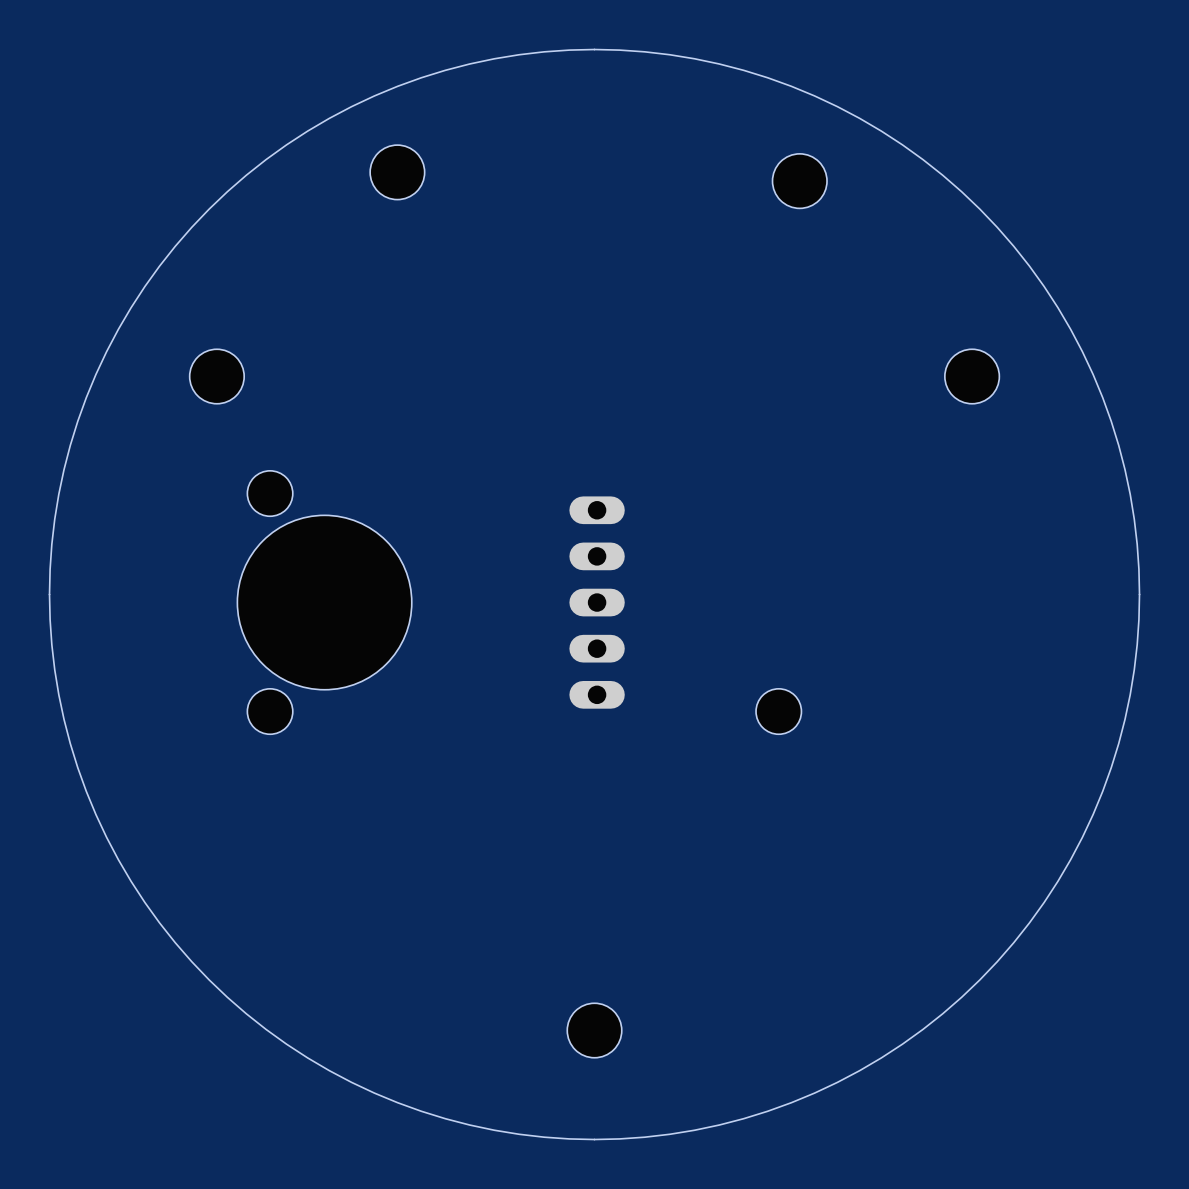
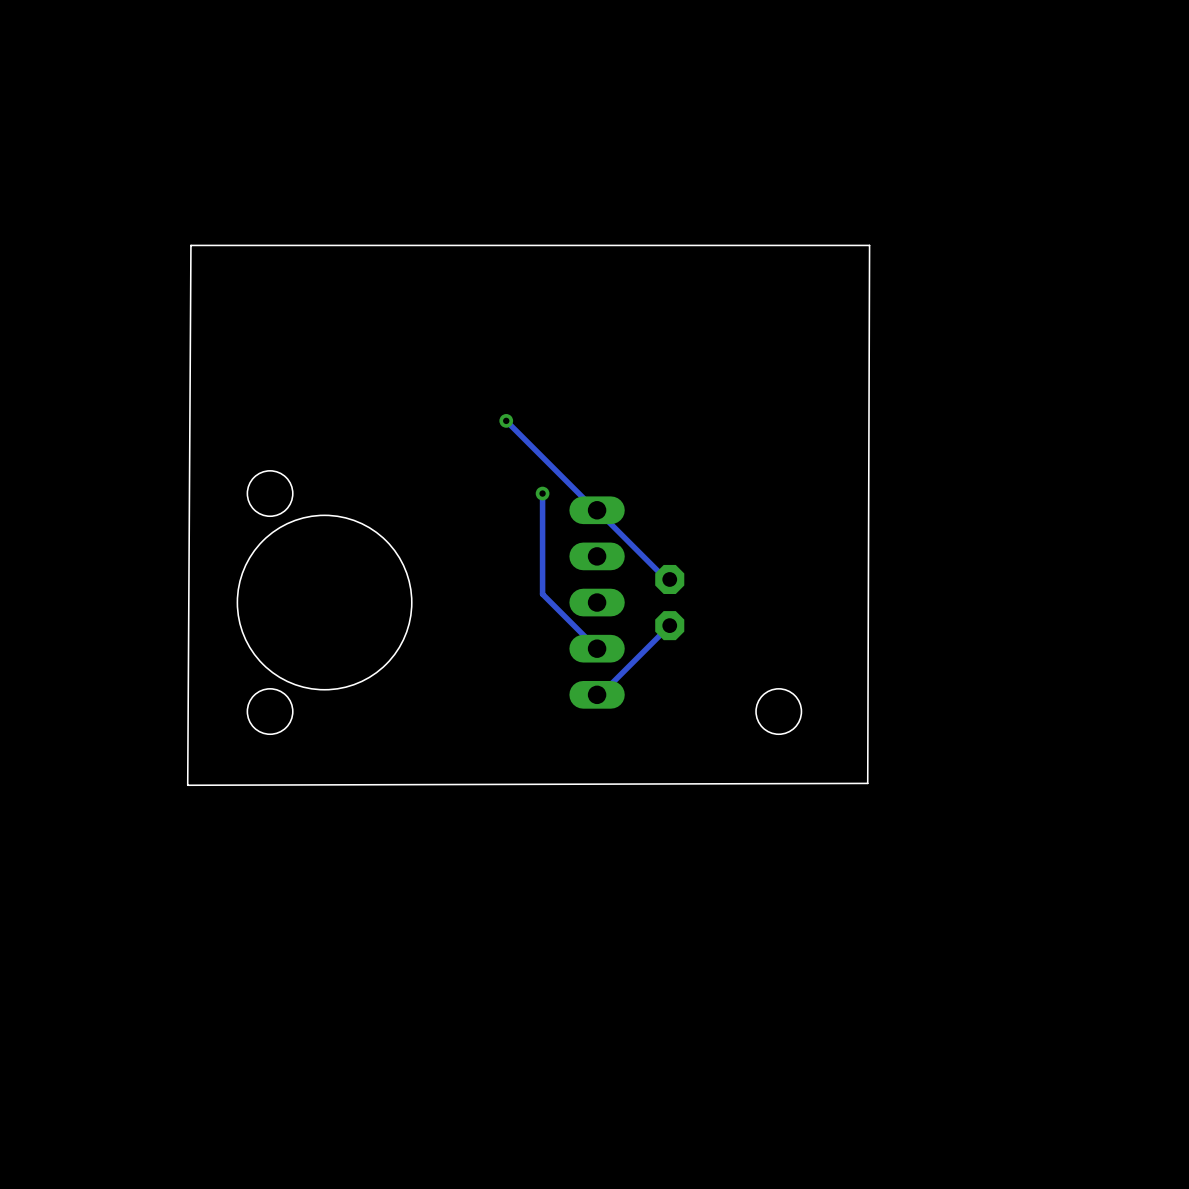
board edge: (594, 49) (544, 51) (494, 58) (445, 70) (397, 86) (351, 106) (307, 131) (246, 175) (209, 209) (175, 246) (131, 307) (106, 351) (86, 397) (70, 445) (58, 494) (51, 544) (49, 594) (51, 644) (58, 694) (70, 743) (86, 791) (106, 837) (131, 881) (175, 942) (209, 979) (246, 1013) (307, 1057) (351, 1082) (397, 1102) (445, 1118) (494, 1130) (544, 1137) (594, 1139) (644, 1137) (694, 1130) (743, 1118) (791, 1102) (837, 1082) (881, 1057) (942, 1013) (979, 979) (1013, 942) (1057, 881) (1082, 837) (1102, 791) (1118, 743) (1130, 694) (1137, 644) (1139, 594) (1137, 544) (1130, 494) (1118, 445) (1102, 397) (1082, 351) (1057, 307) (1013, 246) (979, 209) (942, 175) (881, 131) (837, 106) (791, 86) (743, 70) (694, 58) (644, 51) (594, 49) -> none
hole: (397, 172) -> none
hole: (799, 181) -> none
board edge: none -> (869, 245) (190, 245) (187, 785) (867, 783) (869, 245)
hole: (216, 376) -> none
hole: (972, 376) -> none
track: none -> (506, 420) (666, 579) (669, 579)
via: none -> (506, 420)
track: none -> (542, 493) (542, 594) (597, 648)
via: none -> (542, 493)
part: none -> (669, 602)
track: none -> (669, 625) (600, 694) (597, 694)
hole: (594, 1030) -> none

